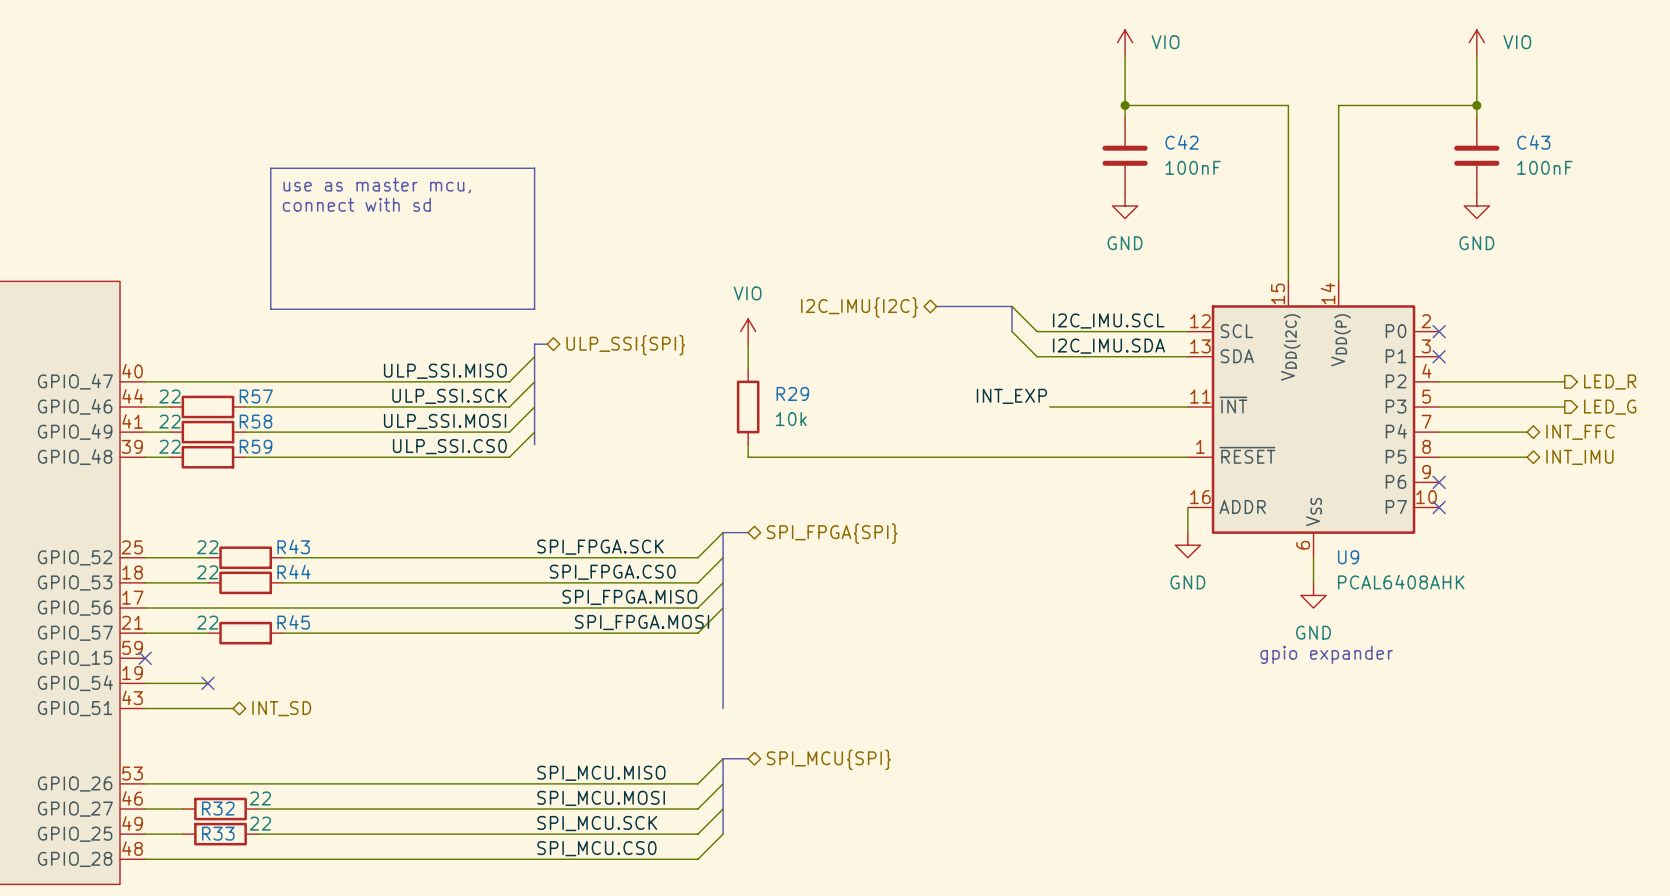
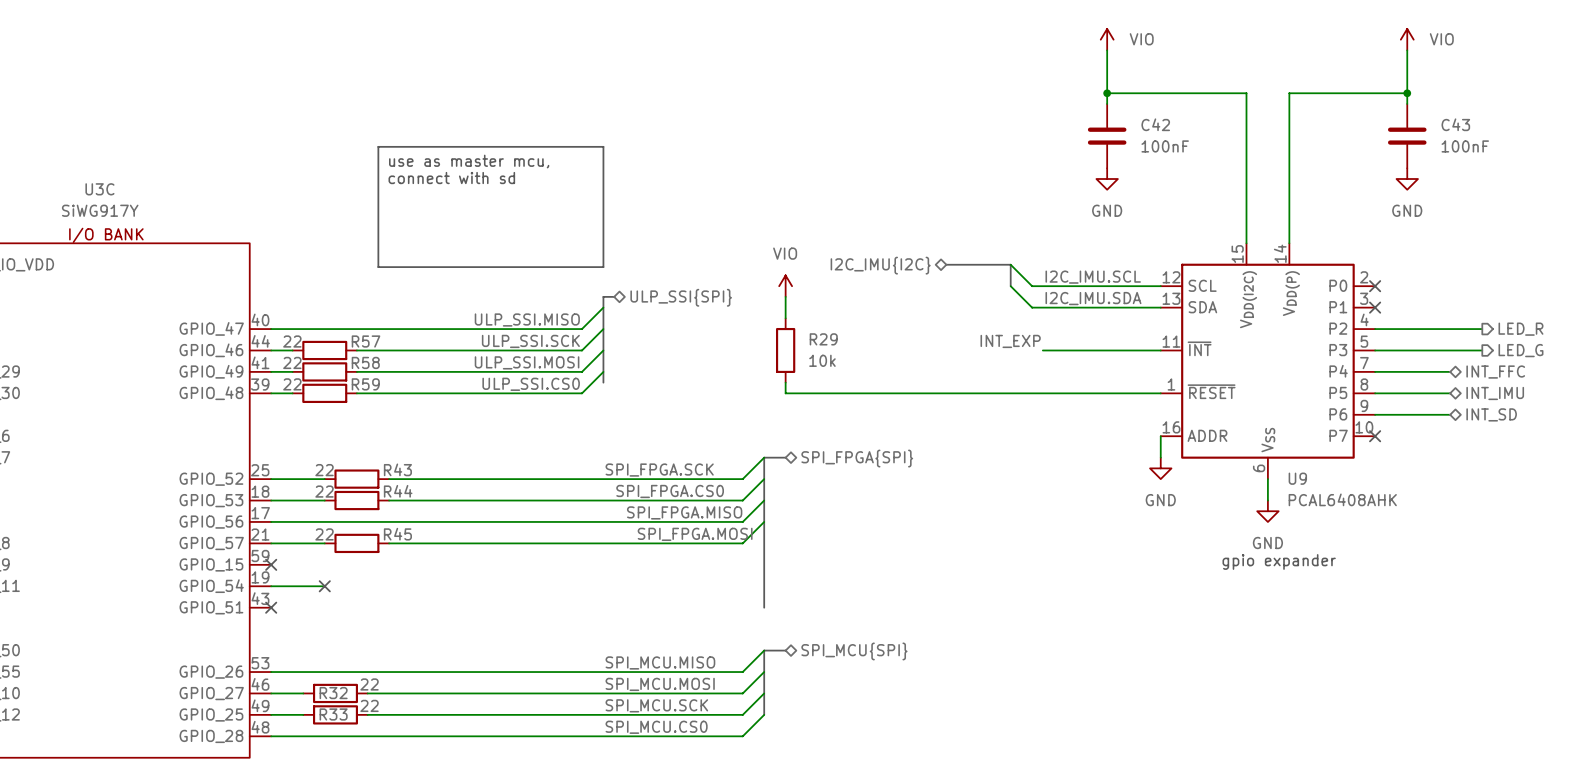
wire: none -> (1375, 414) (1450, 414)
no-connect mark: (1439, 482) -> none
hierarchical label: none -> INT_SD (1491, 414)
wire: (145, 708) (233, 708) -> none
no-connect mark: none -> (271, 607)
hierarchical label: INT_SD (281, 708) -> none

